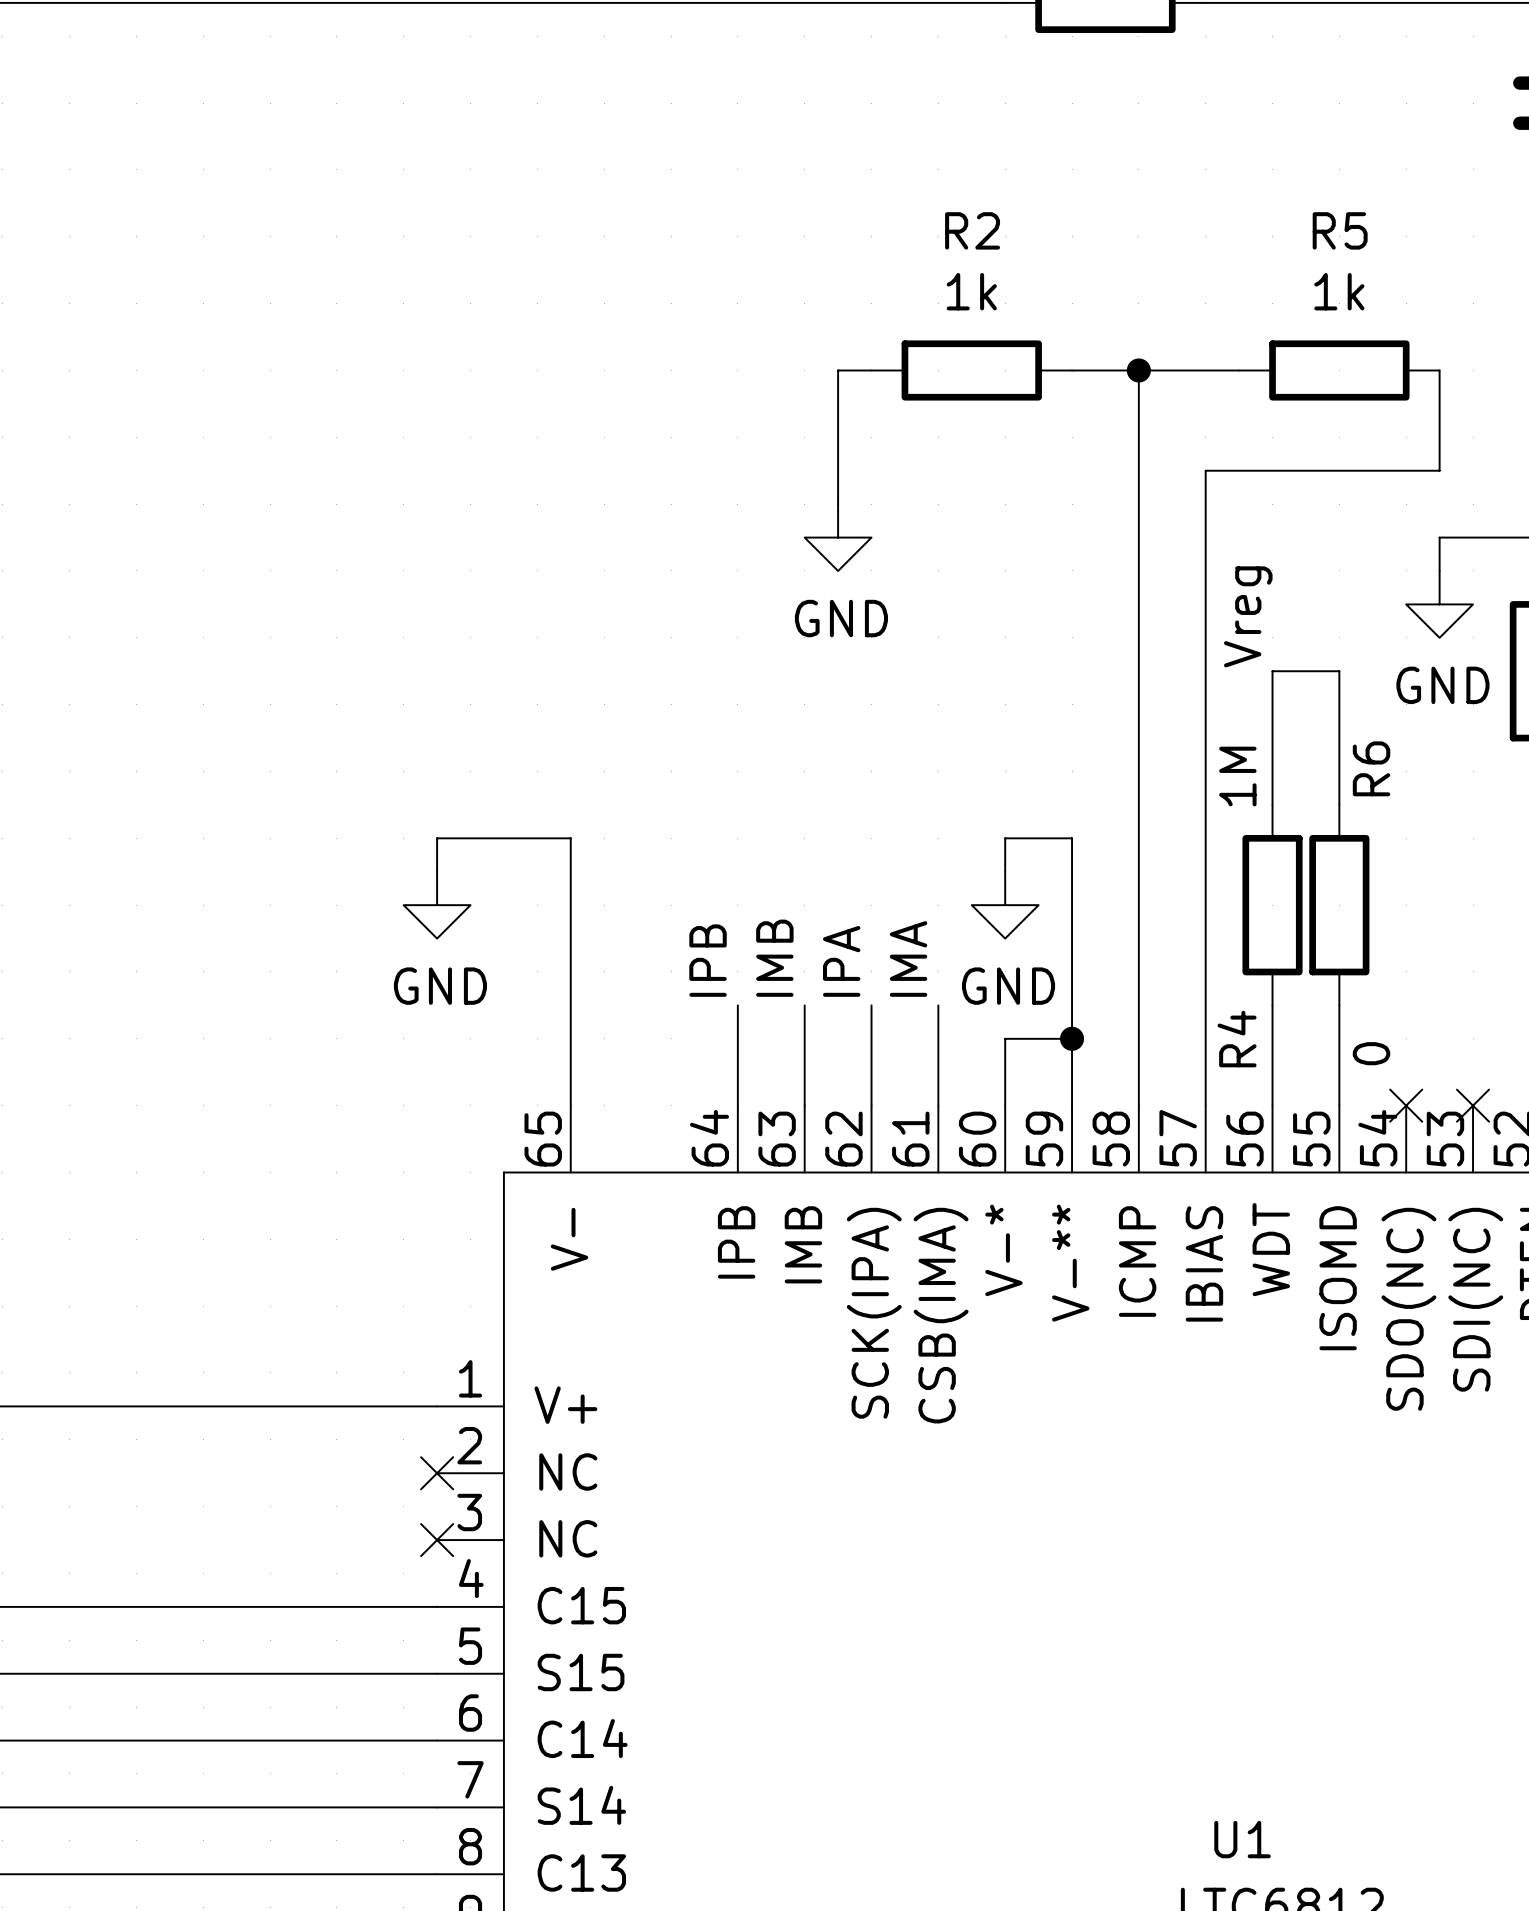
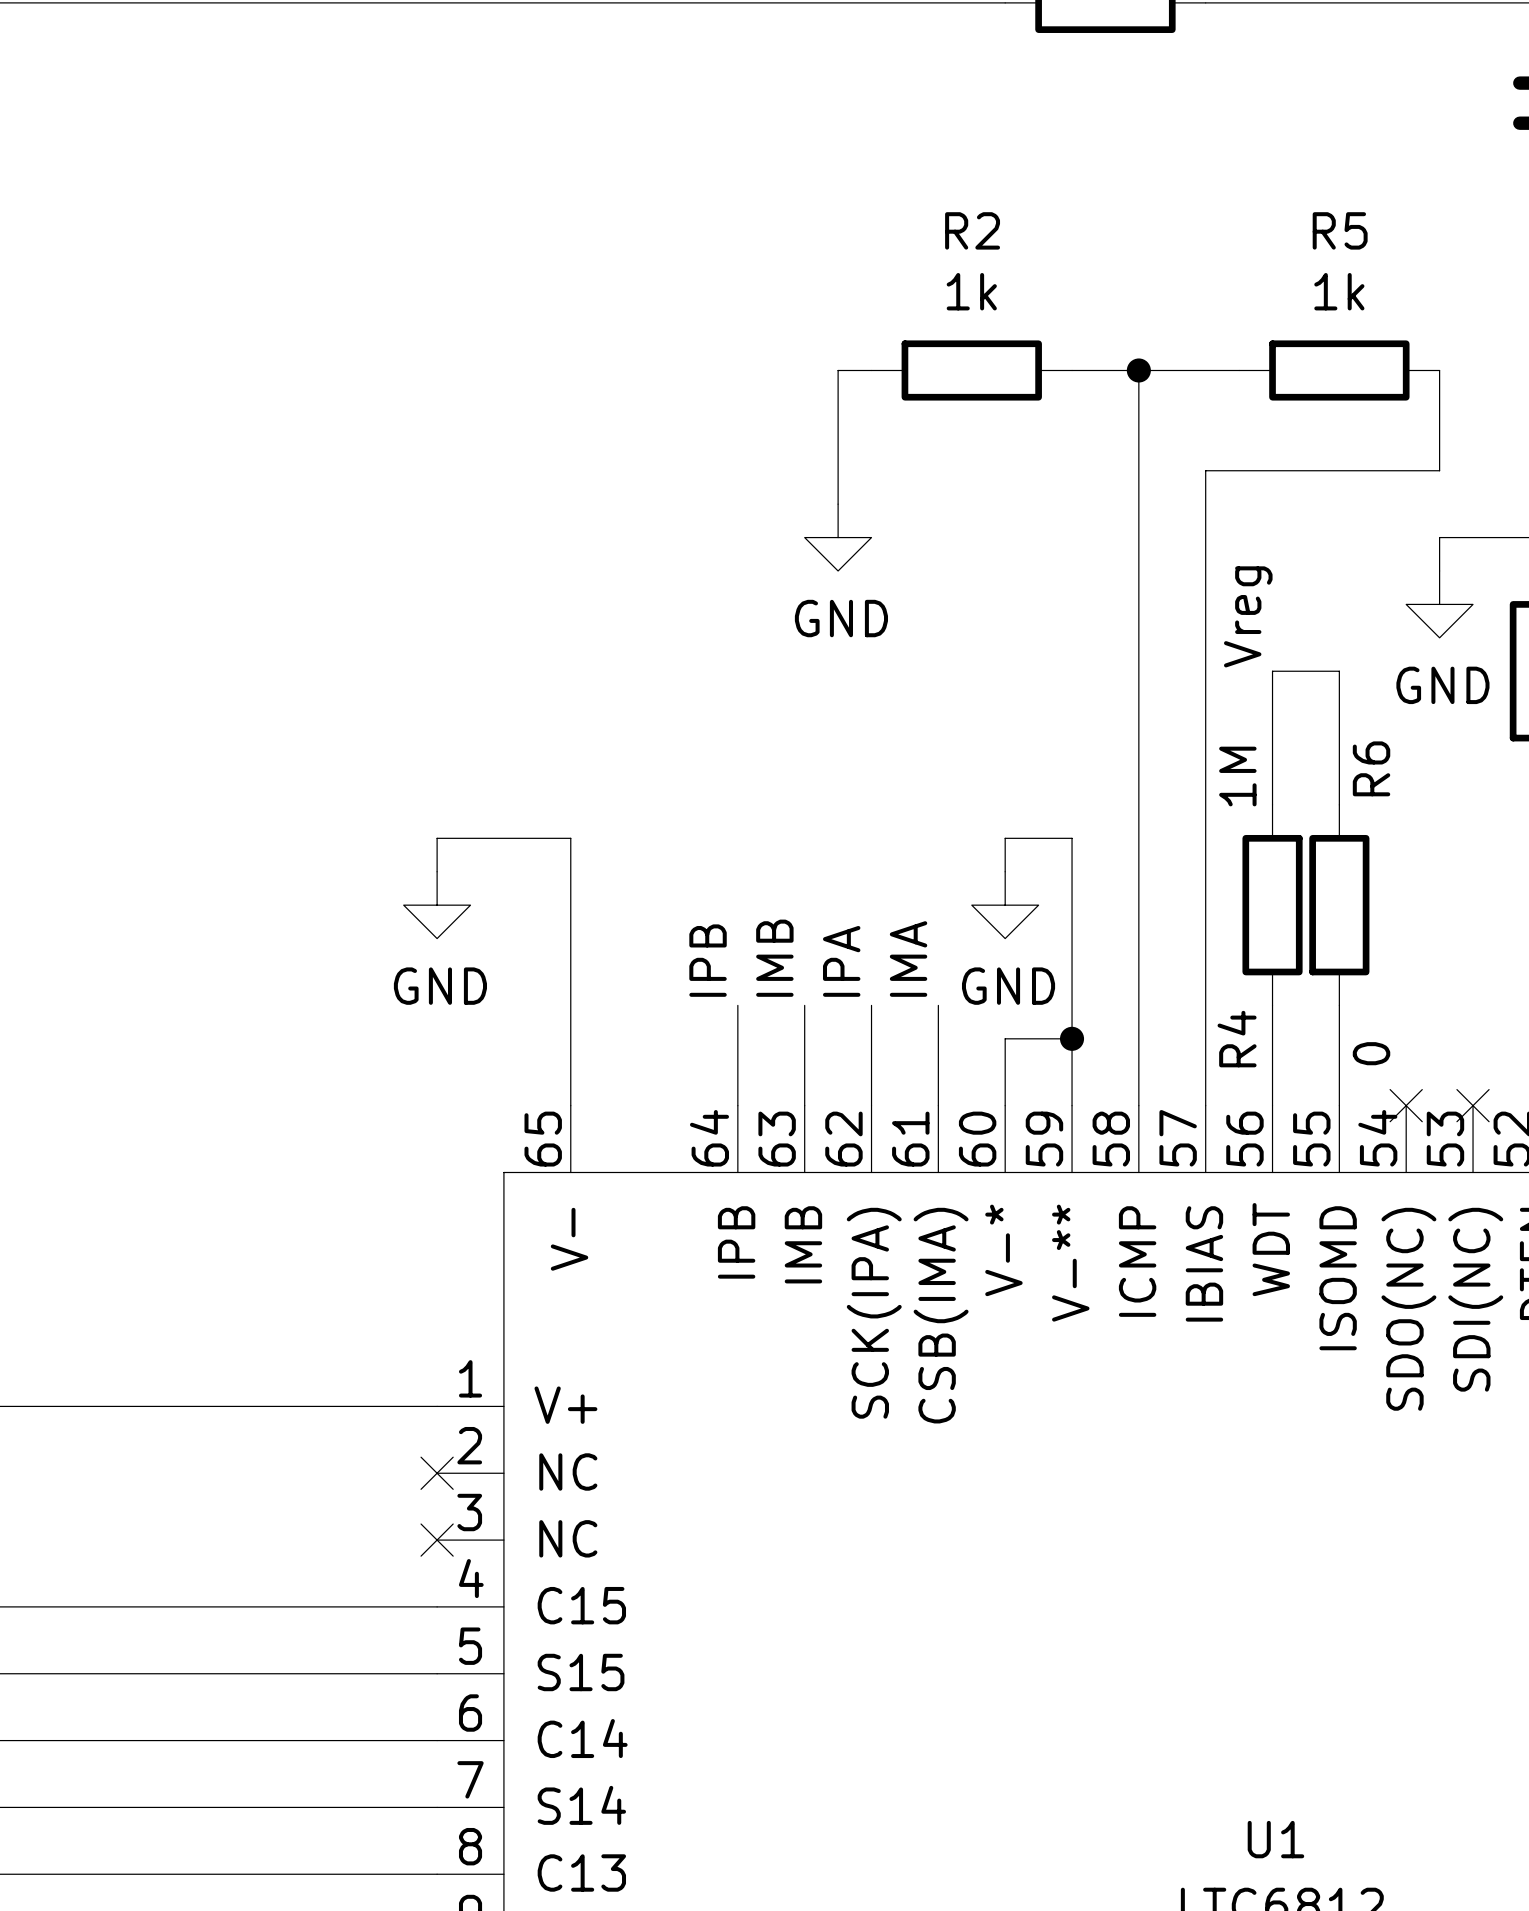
U1 name position: U1 (1242, 1839) -> U1 (1275, 1839)

